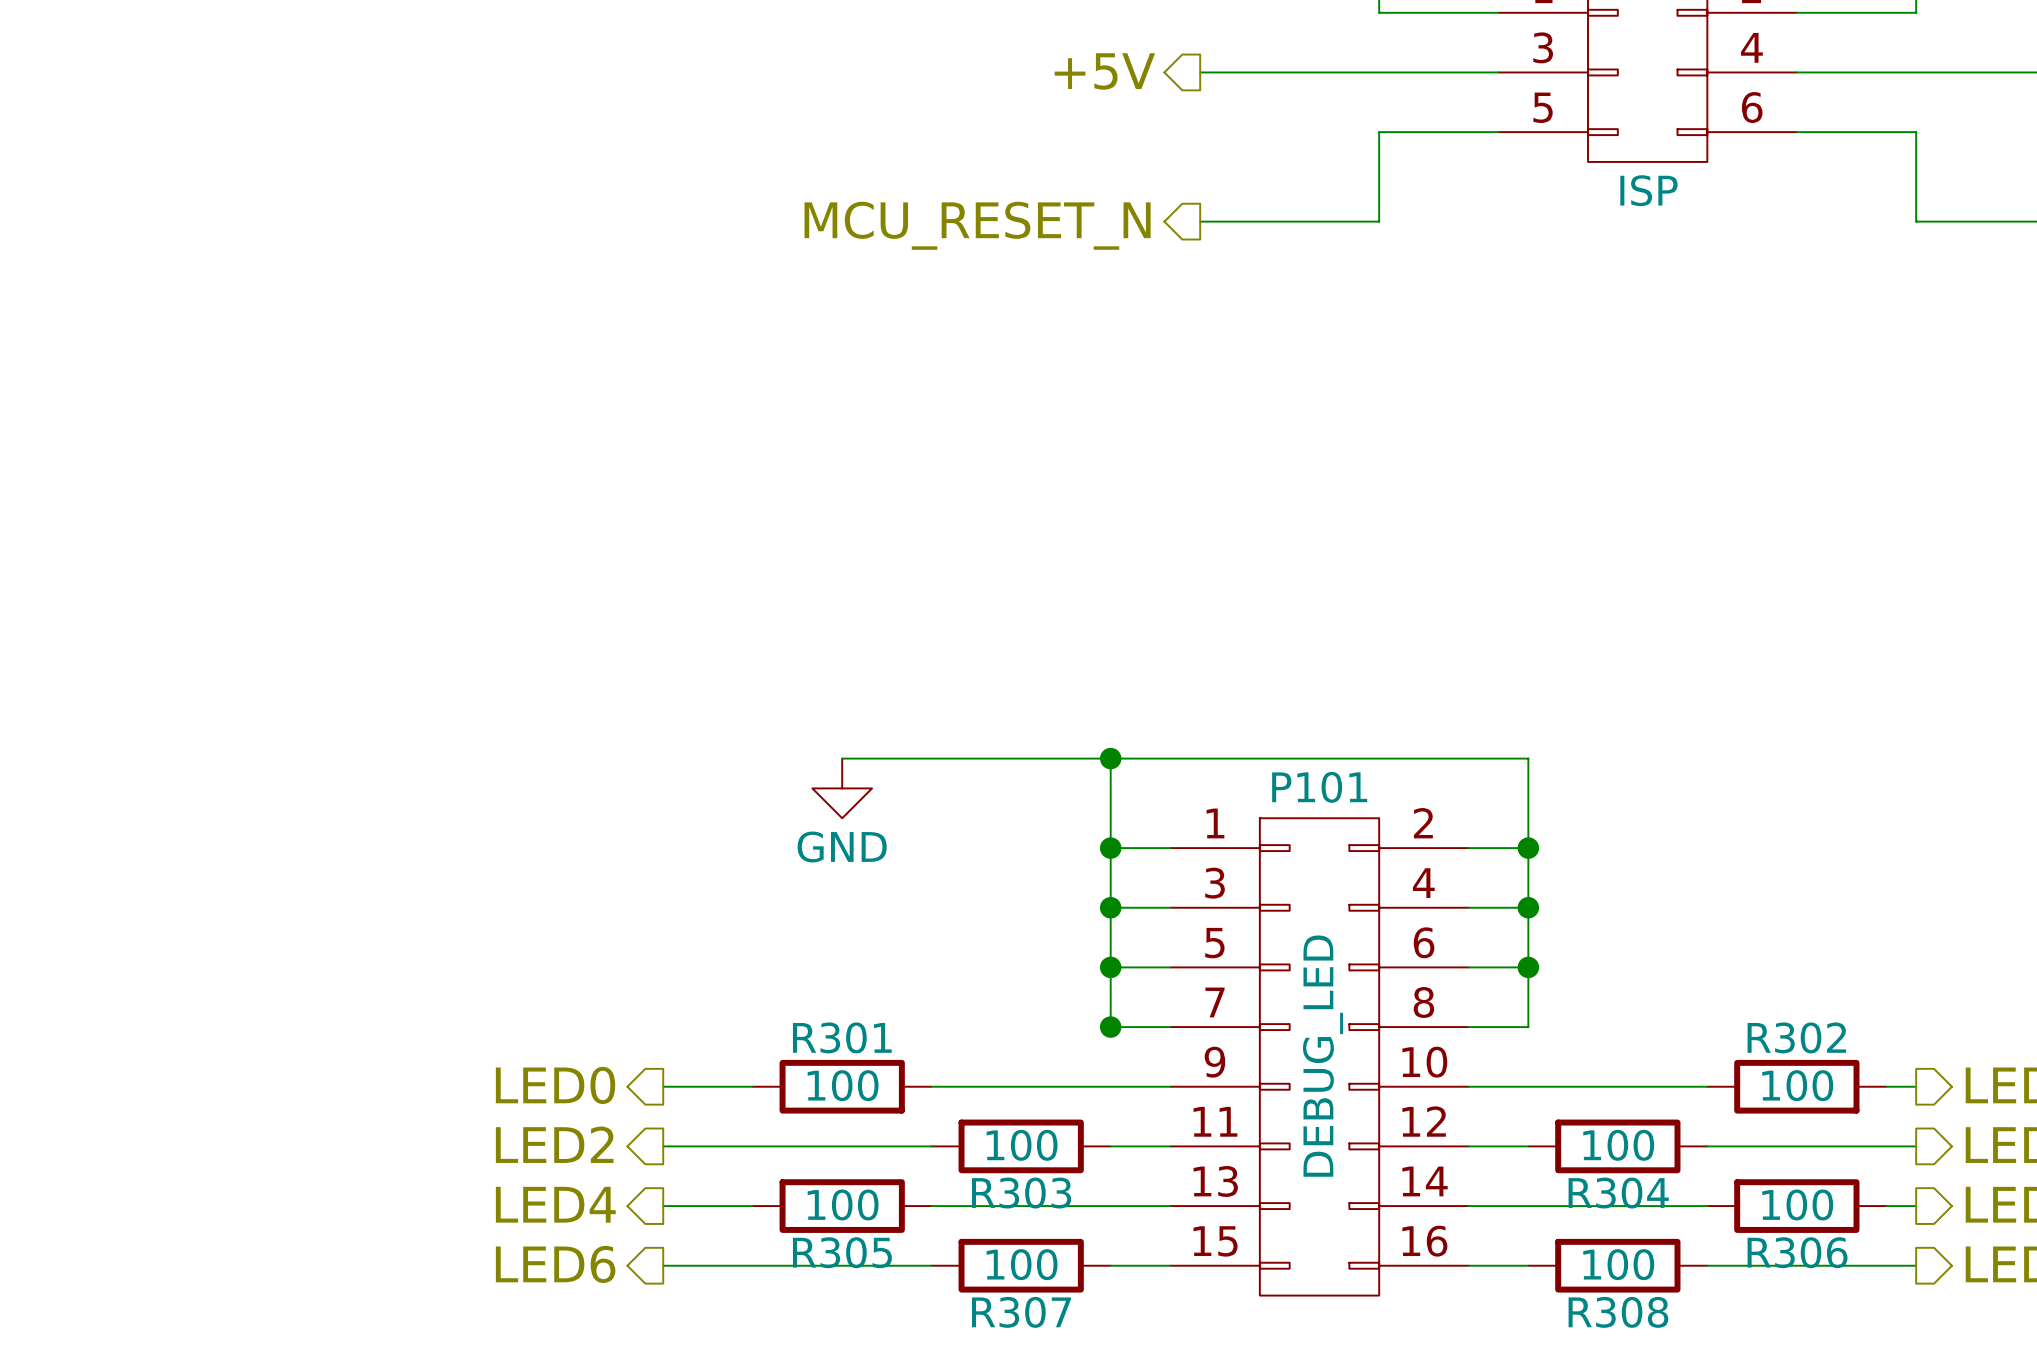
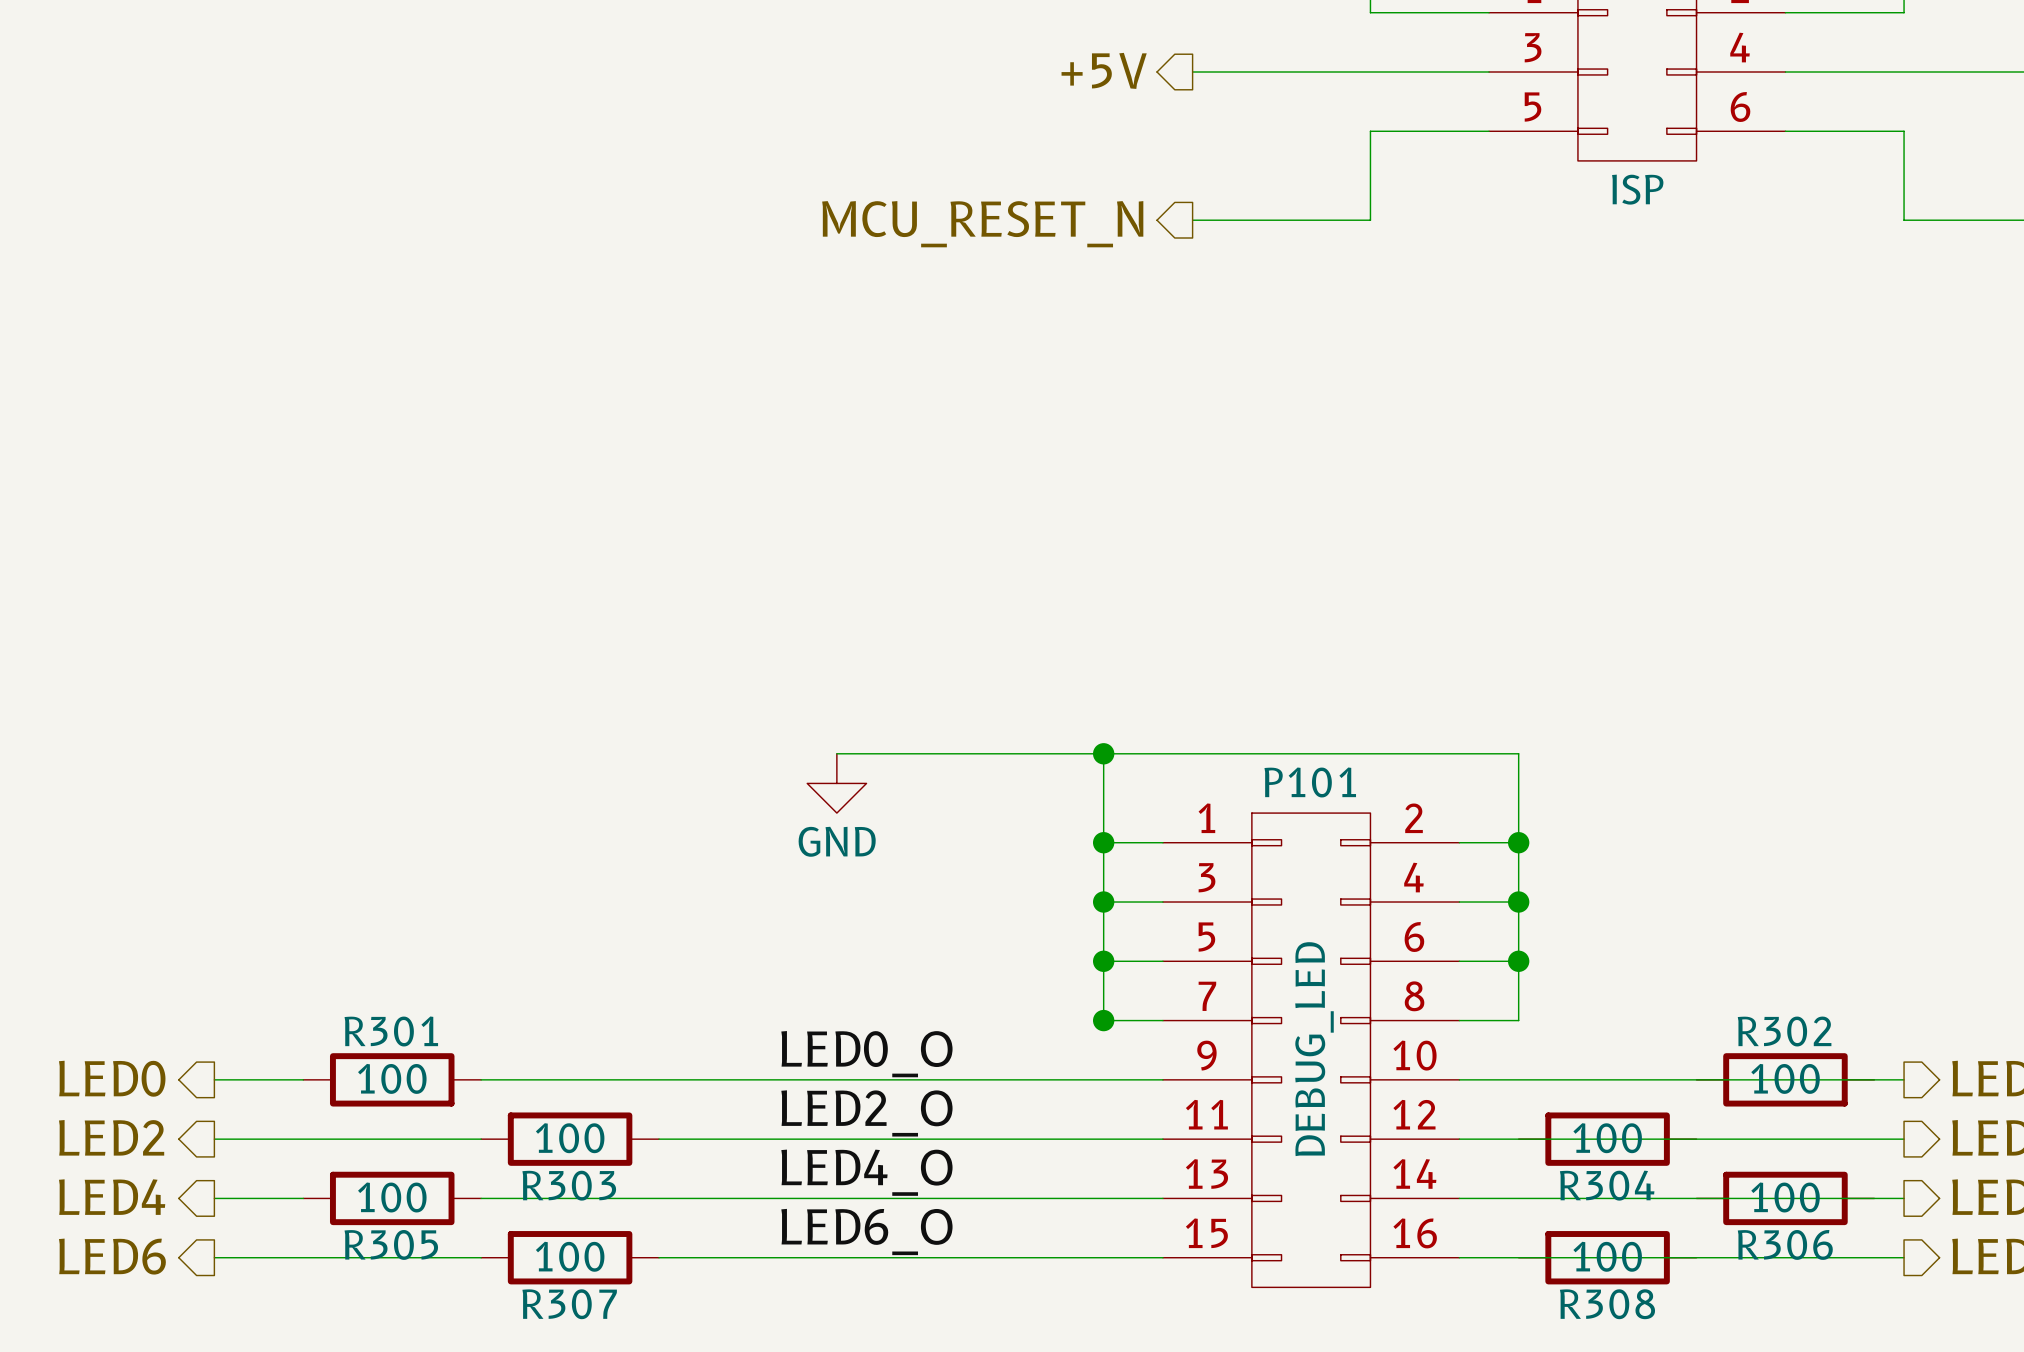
label: none -> LED0_O (866, 1054)
hierarchical label position: LED0 (555, 1085) -> LED0 (112, 1078)
wire: none -> (214, 1079) (303, 1079)
wire: none -> (481, 1079) (659, 1079)
wire: none -> (747, 1079) (925, 1079)
R301 position: (842, 1086) -> (392, 1079)
wire: none -> (1696, 1079) (1874, 1079)
label: none -> LED2_O (866, 1113)
hierarchical label position: LED2 (554, 1144) -> LED2 (111, 1137)
wire: none -> (214, 1139) (481, 1139)
wire: none -> (925, 1139) (1103, 1139)
R303 position: (1021, 1146) -> (570, 1139)
wire: none -> (1518, 1139) (1696, 1139)
label: none -> LED4_O (866, 1172)
hierarchical label position: LED4 (555, 1204) -> LED4 (112, 1197)
wire: none -> (214, 1198) (303, 1198)
wire: none -> (481, 1198) (659, 1198)
wire: none -> (747, 1198) (925, 1198)
R305 position: (842, 1206) -> (392, 1198)
wire: none -> (1696, 1198) (1874, 1198)
label: none -> LED6_O (866, 1232)
hierarchical label position: LED6 (555, 1264) -> LED6 (112, 1256)
wire: none -> (214, 1257) (481, 1257)
wire: none -> (925, 1257) (1103, 1257)
R307 position: (1021, 1265) -> (570, 1257)
wire: none -> (1518, 1257) (1696, 1257)

